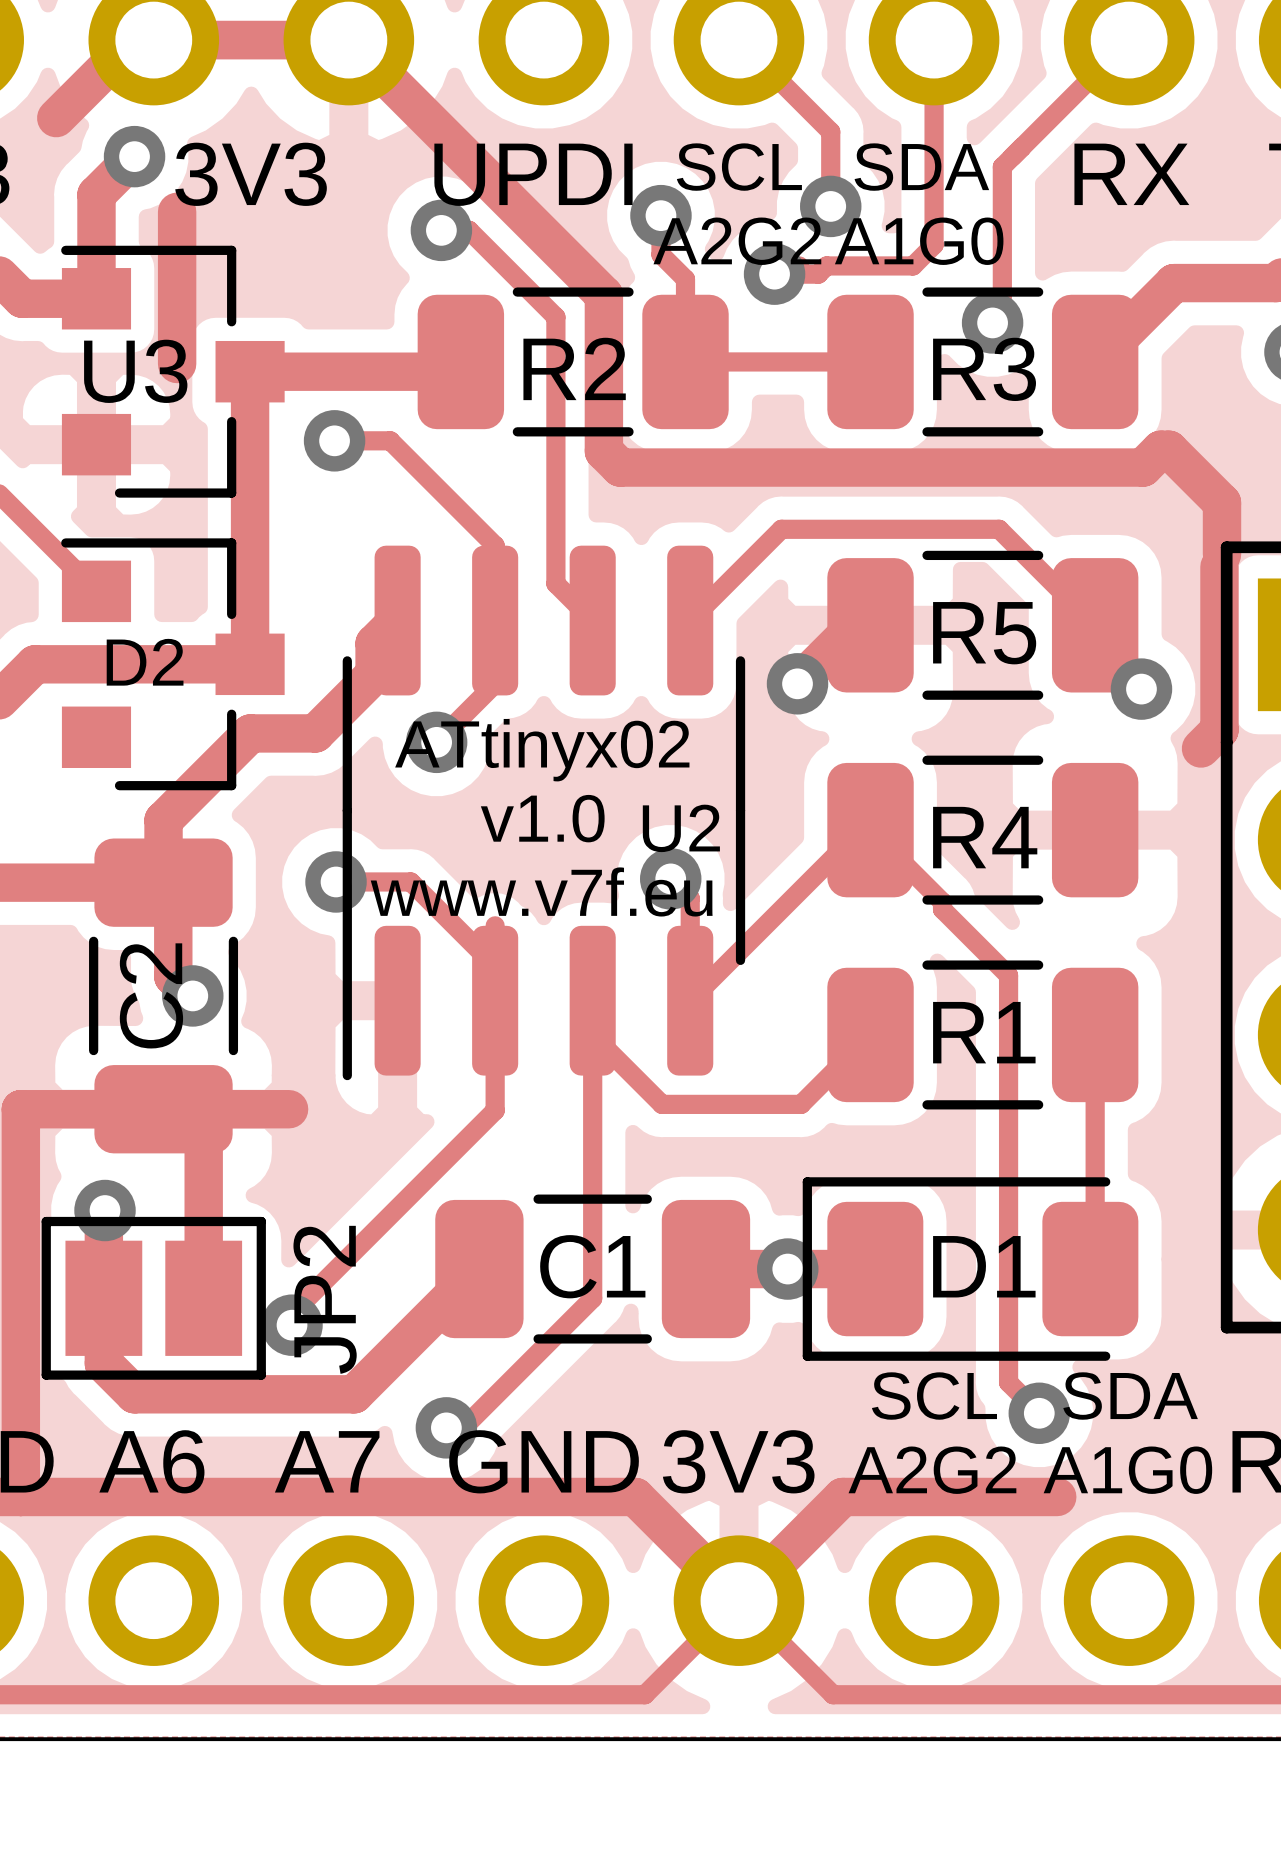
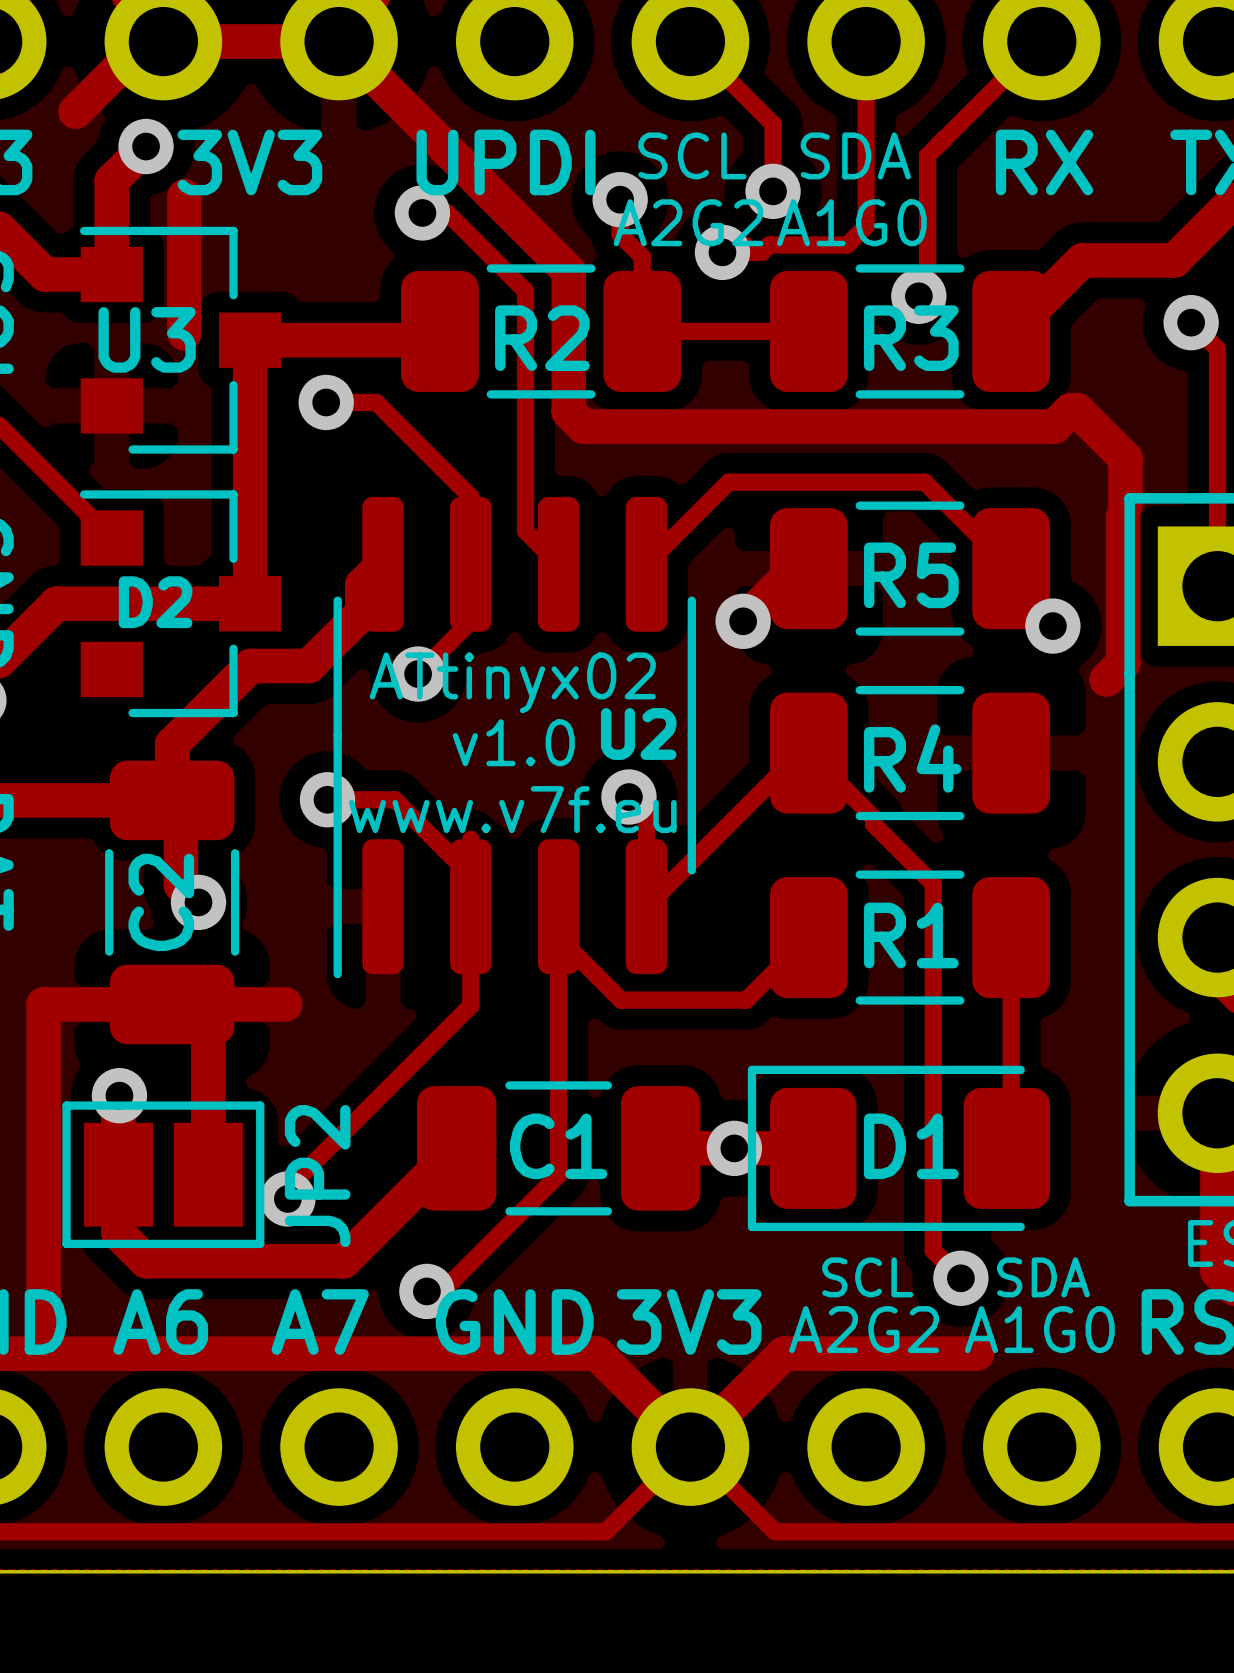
U2 name position: U2 (681, 828) -> U2 (638, 733)
text position: SCL (934, 1396) -> SCL (867, 1277)
text position: SDA (1130, 1396) -> SDA (1043, 1277)

